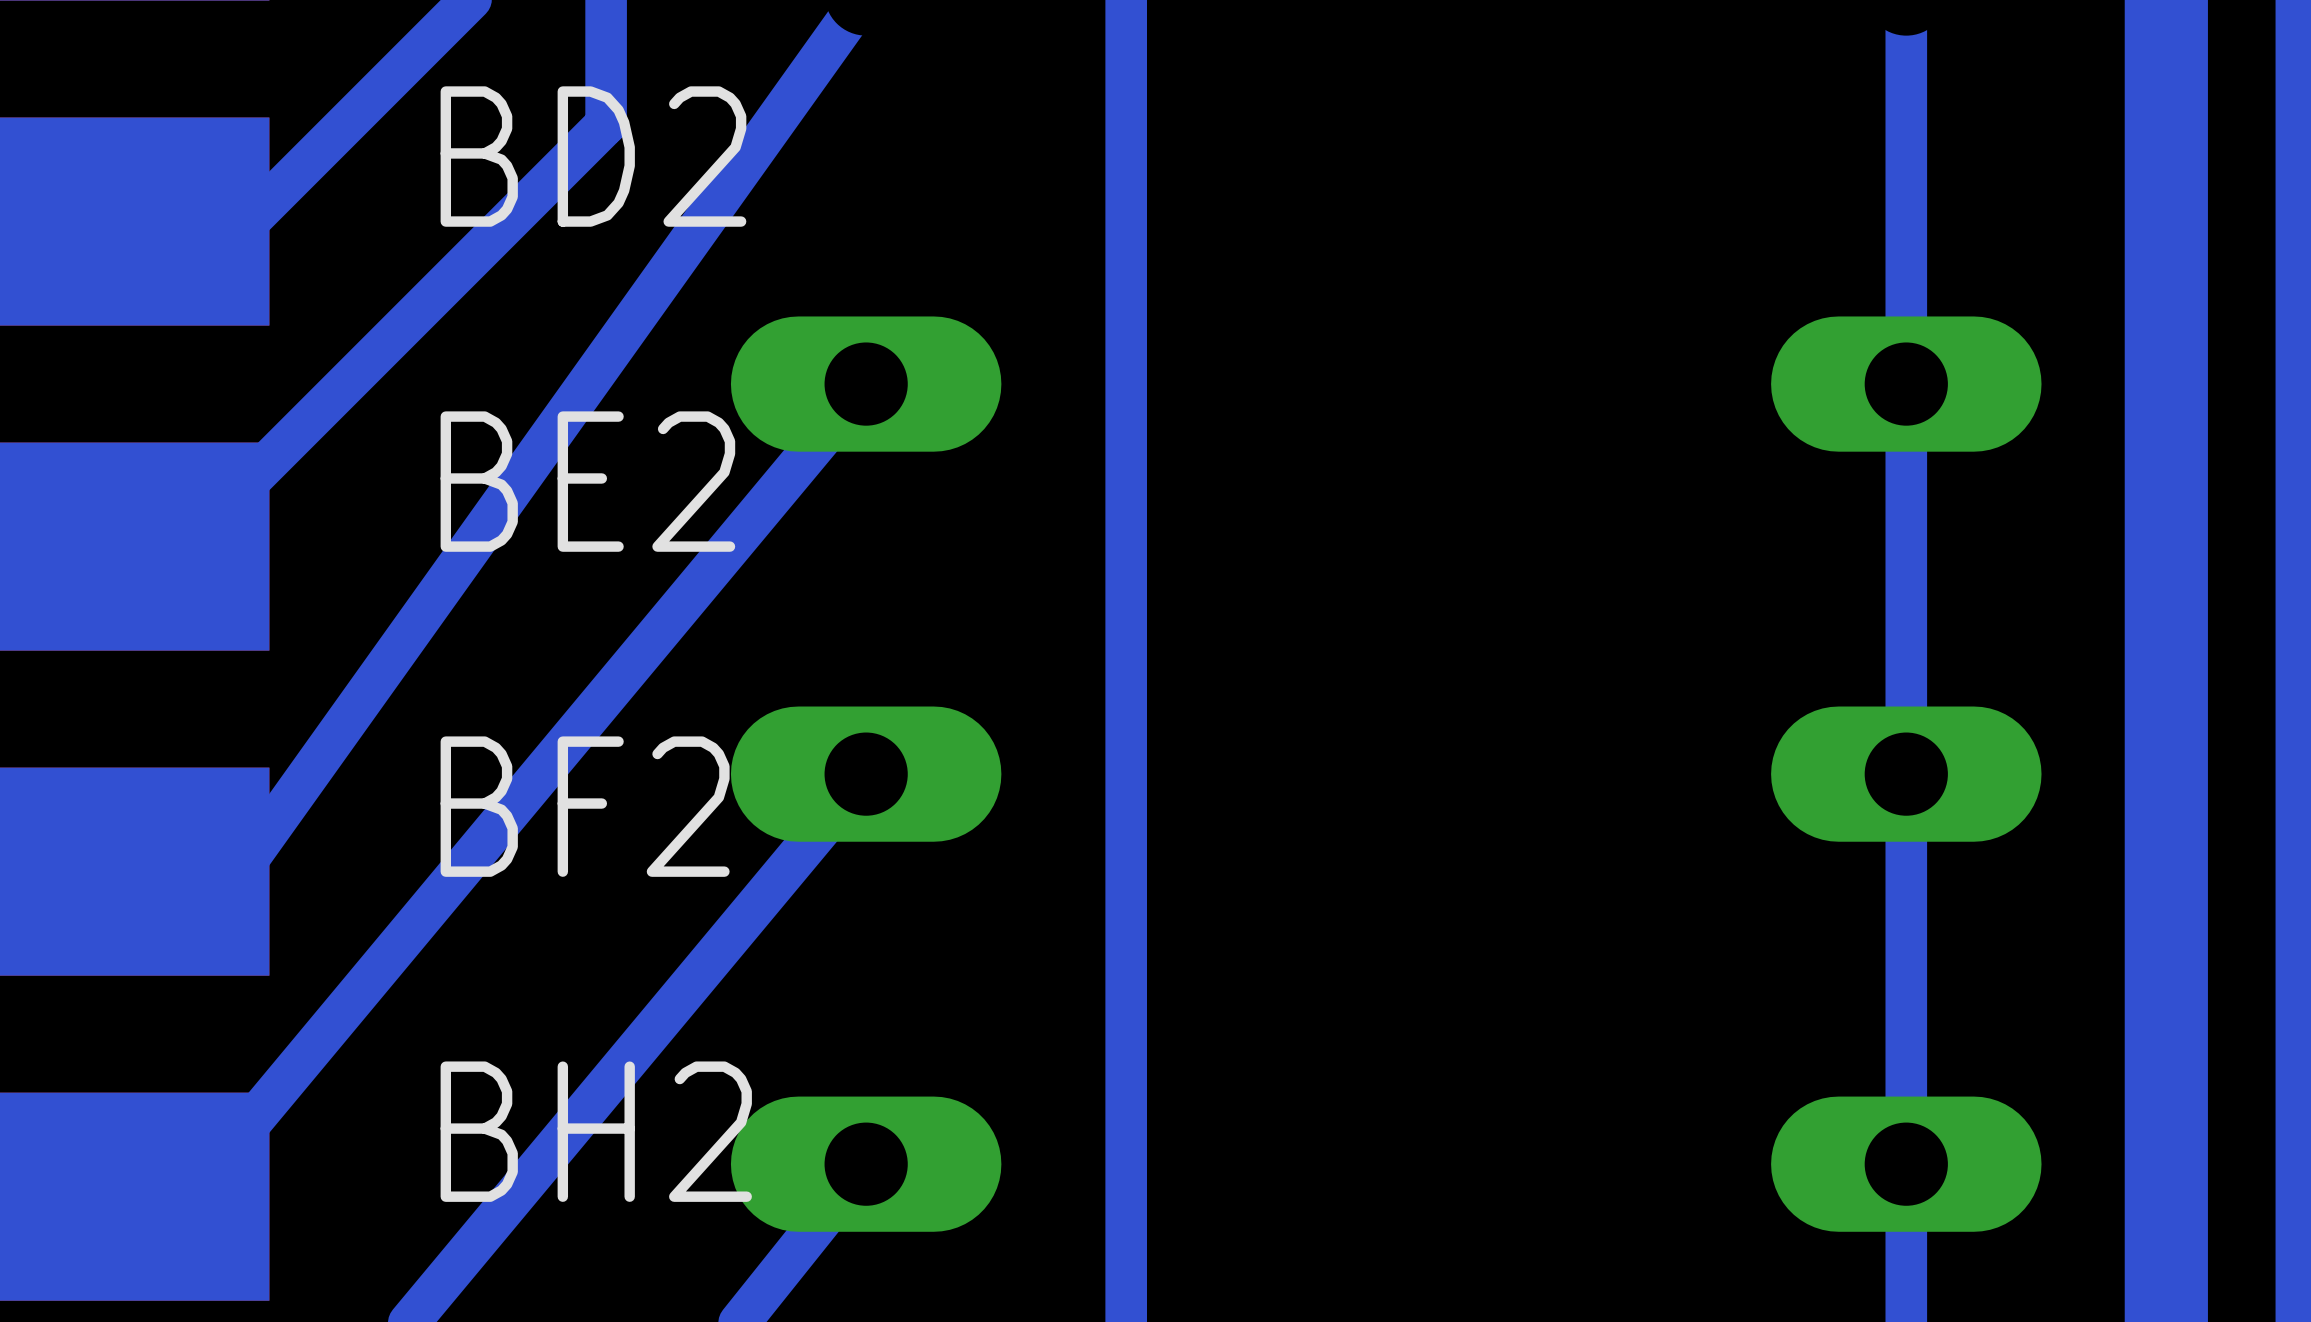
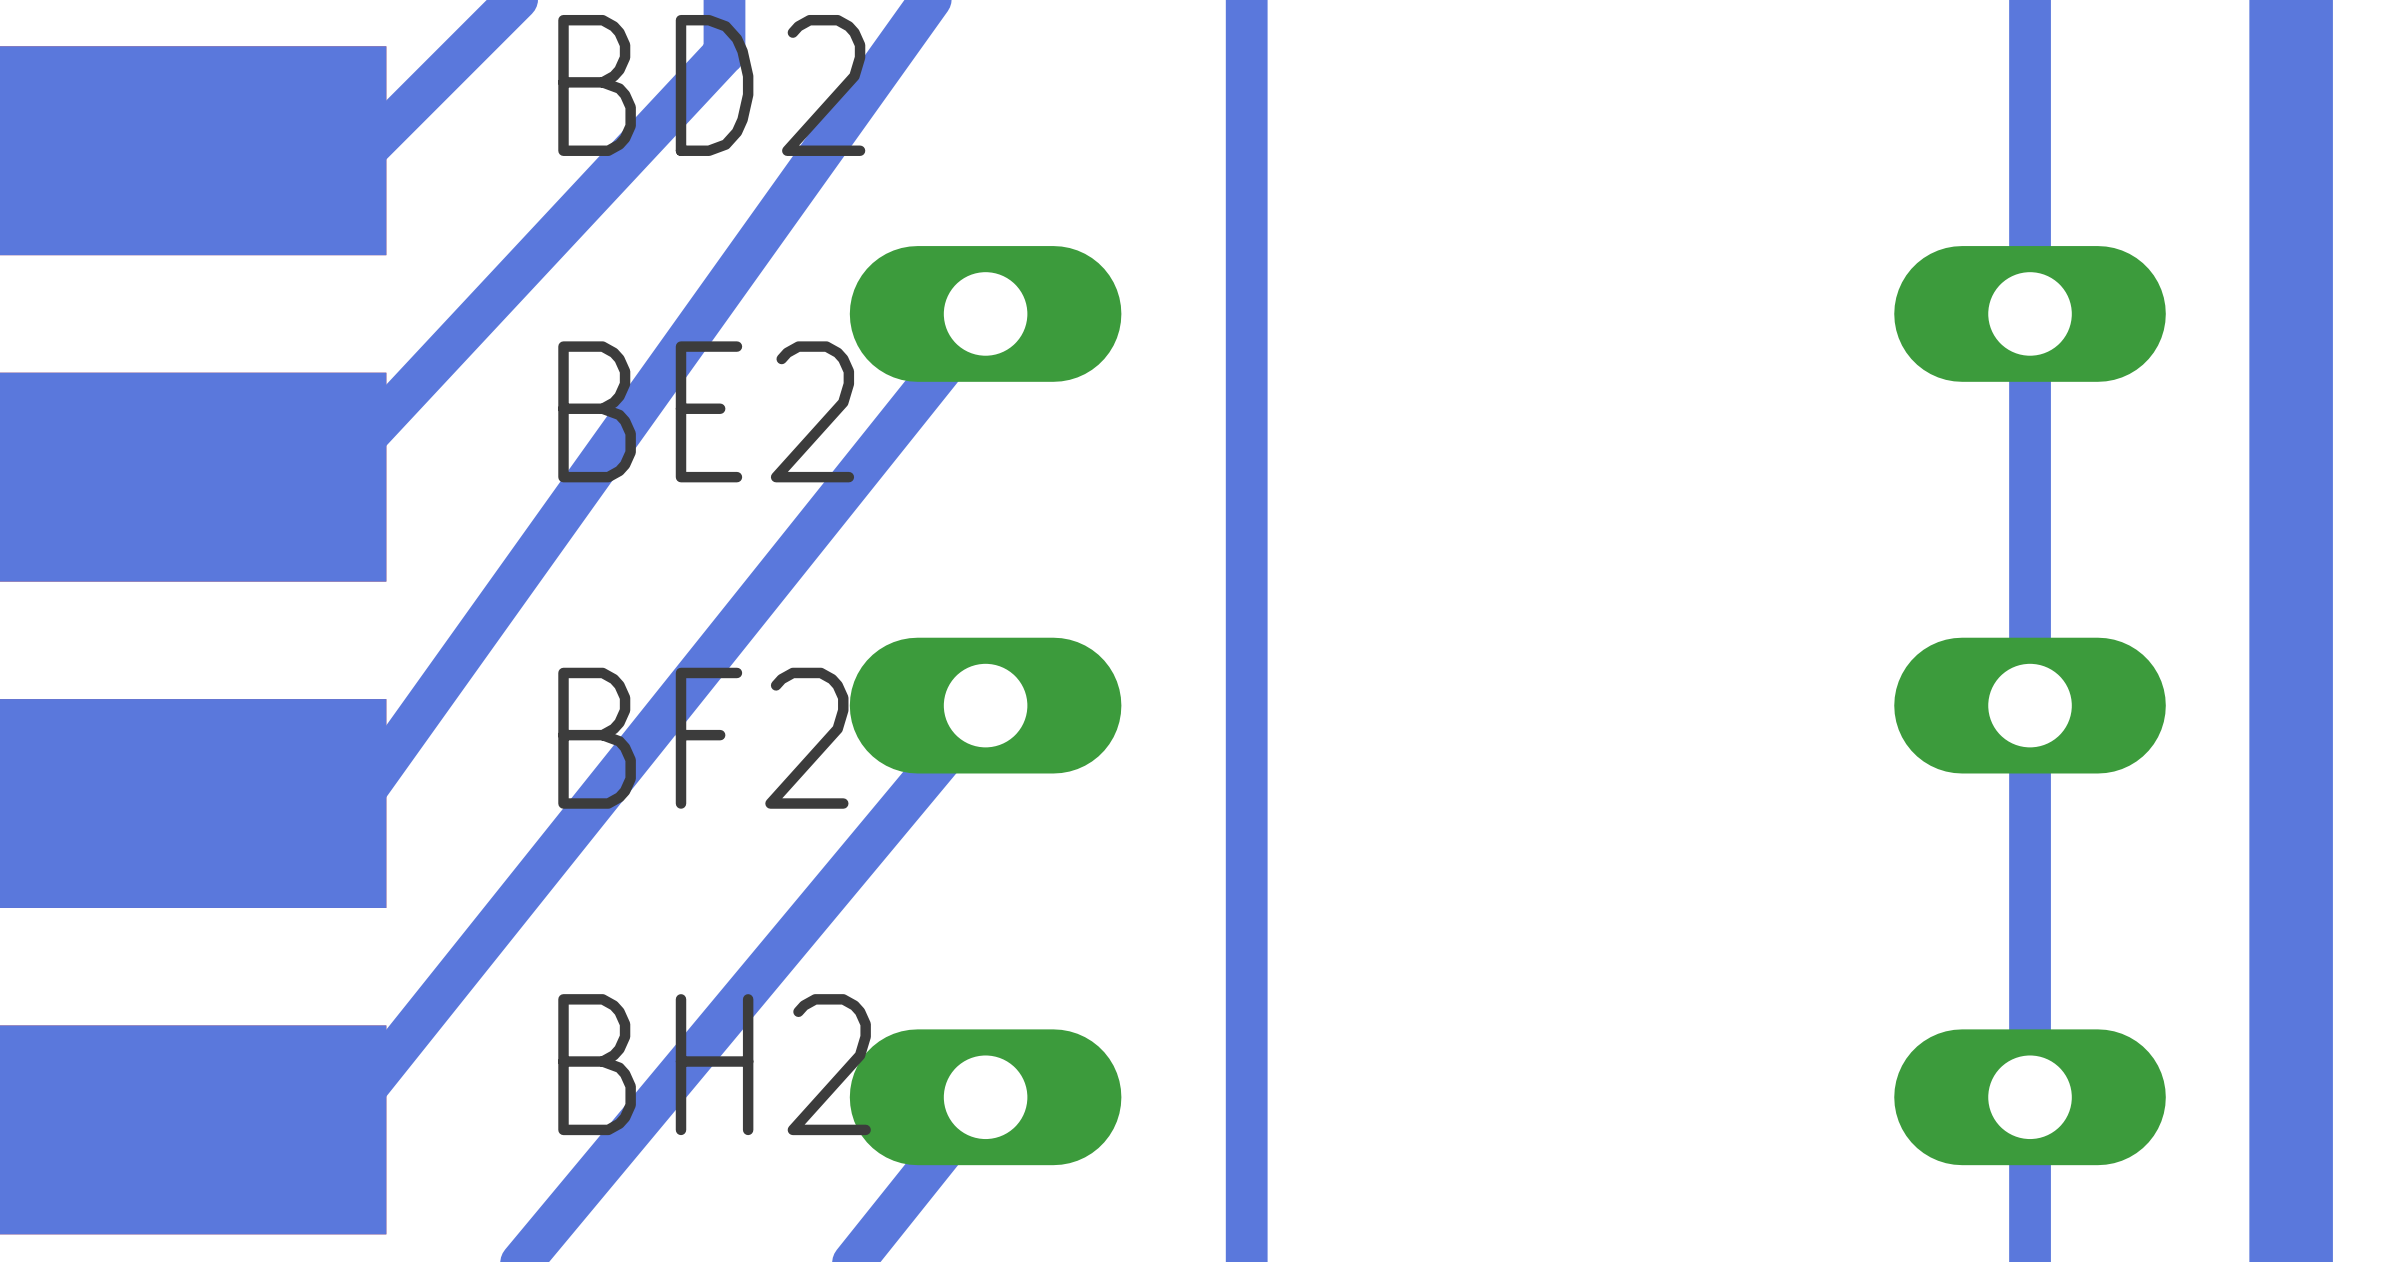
bottom track: (606, 124) (216, 514) -> (724, 52) (358, 444) (332, 444)
bottom track: (866, 384) (216, 1164) -> (985, 313) (358, 1097) (332, 1097)

